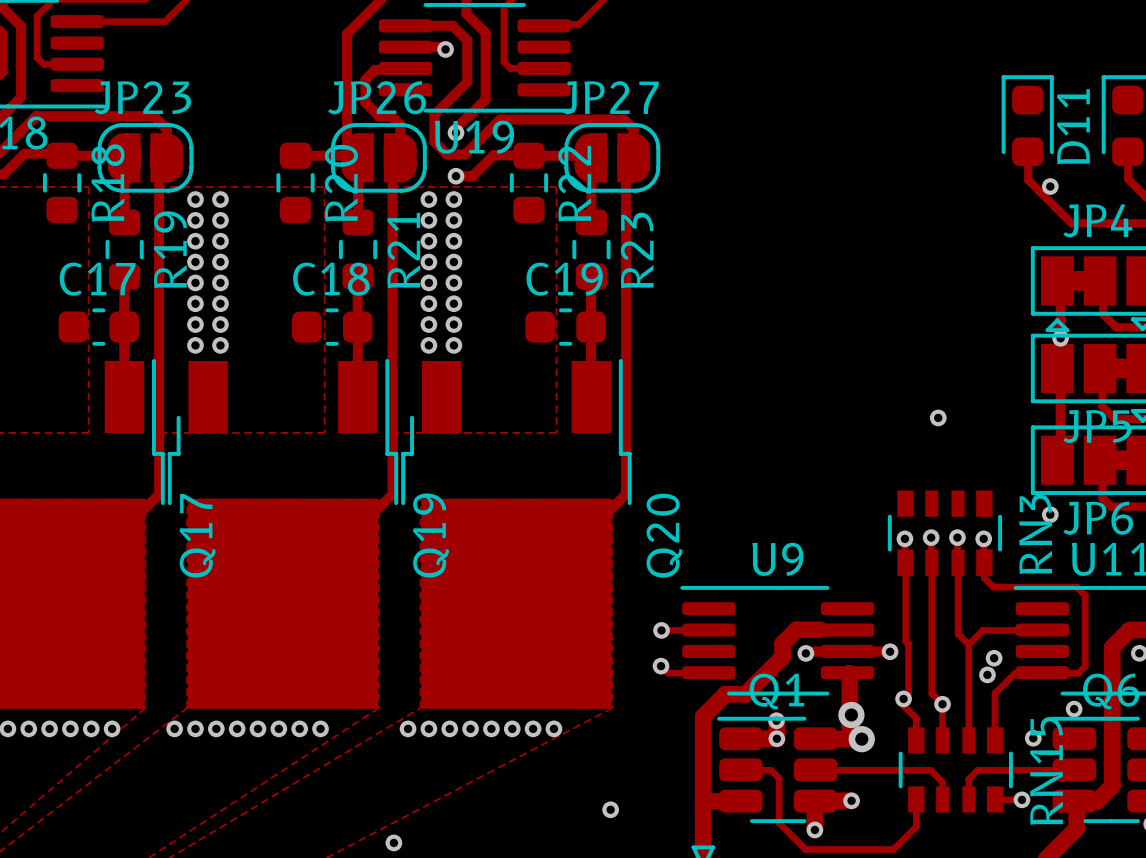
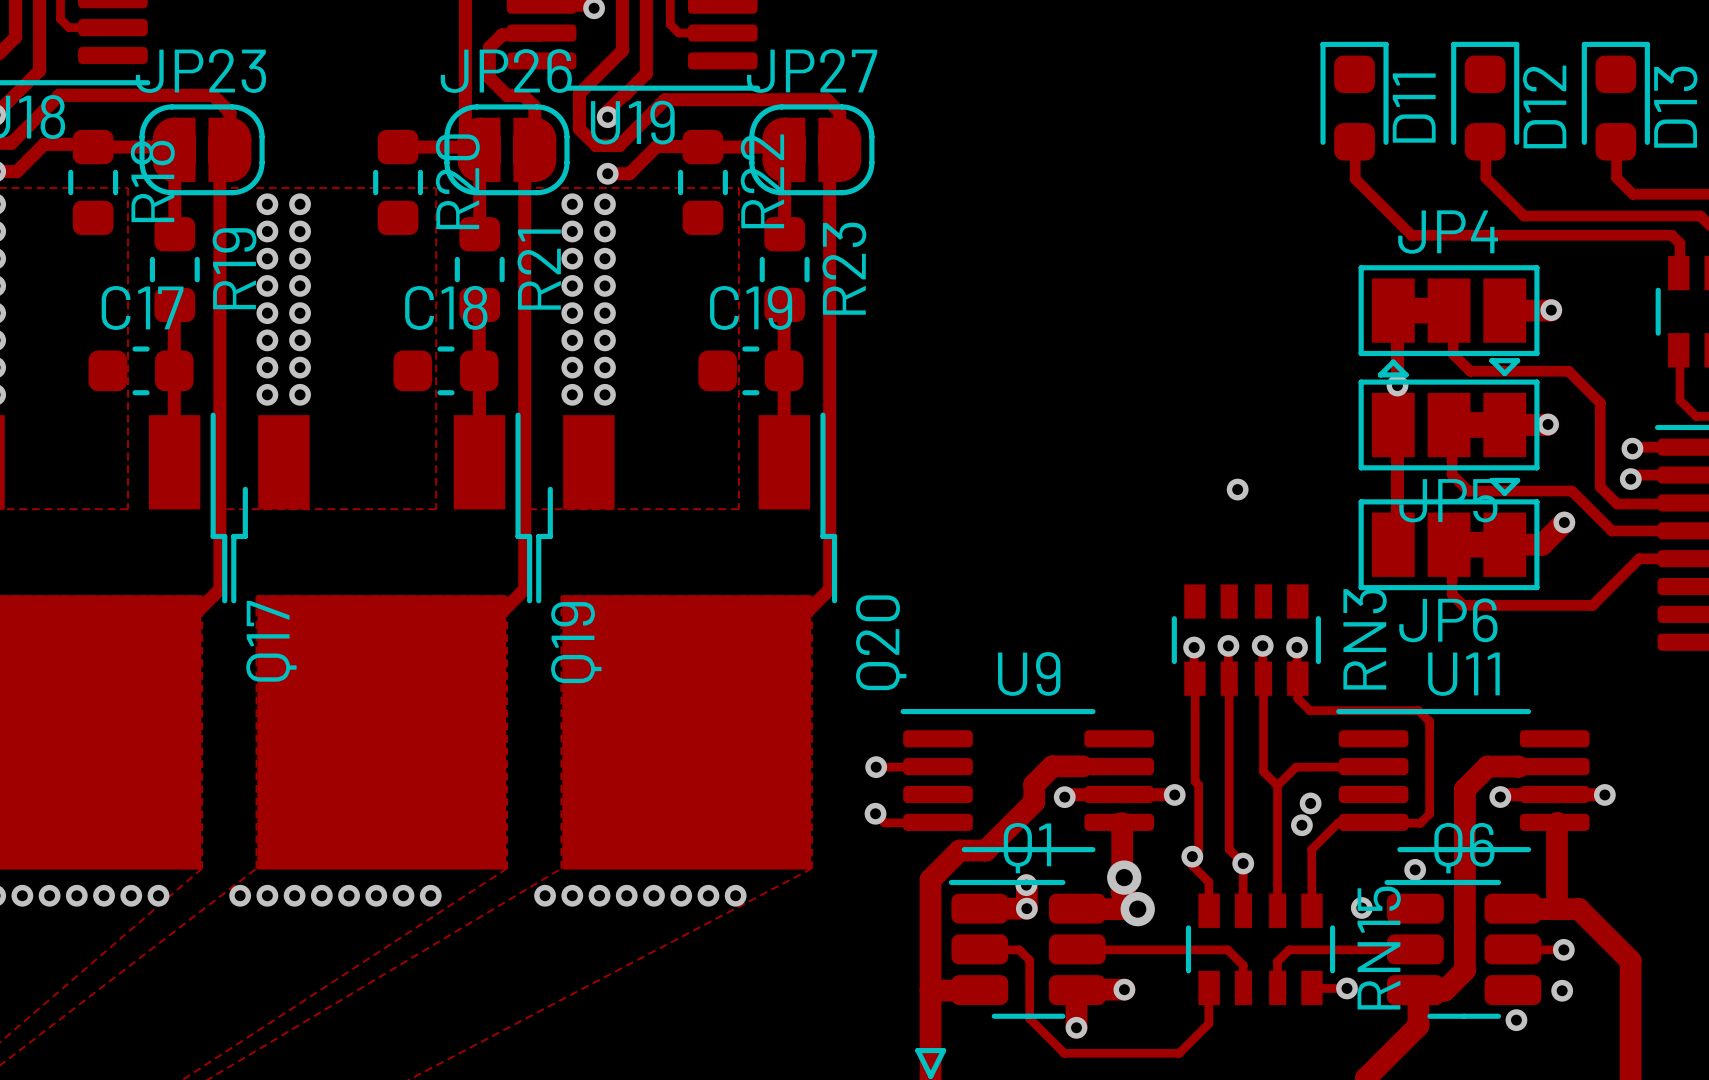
via: (1050, 186) -> none
via: (1050, 514) -> none
via: (610, 809) -> none
via: (393, 842) -> none

